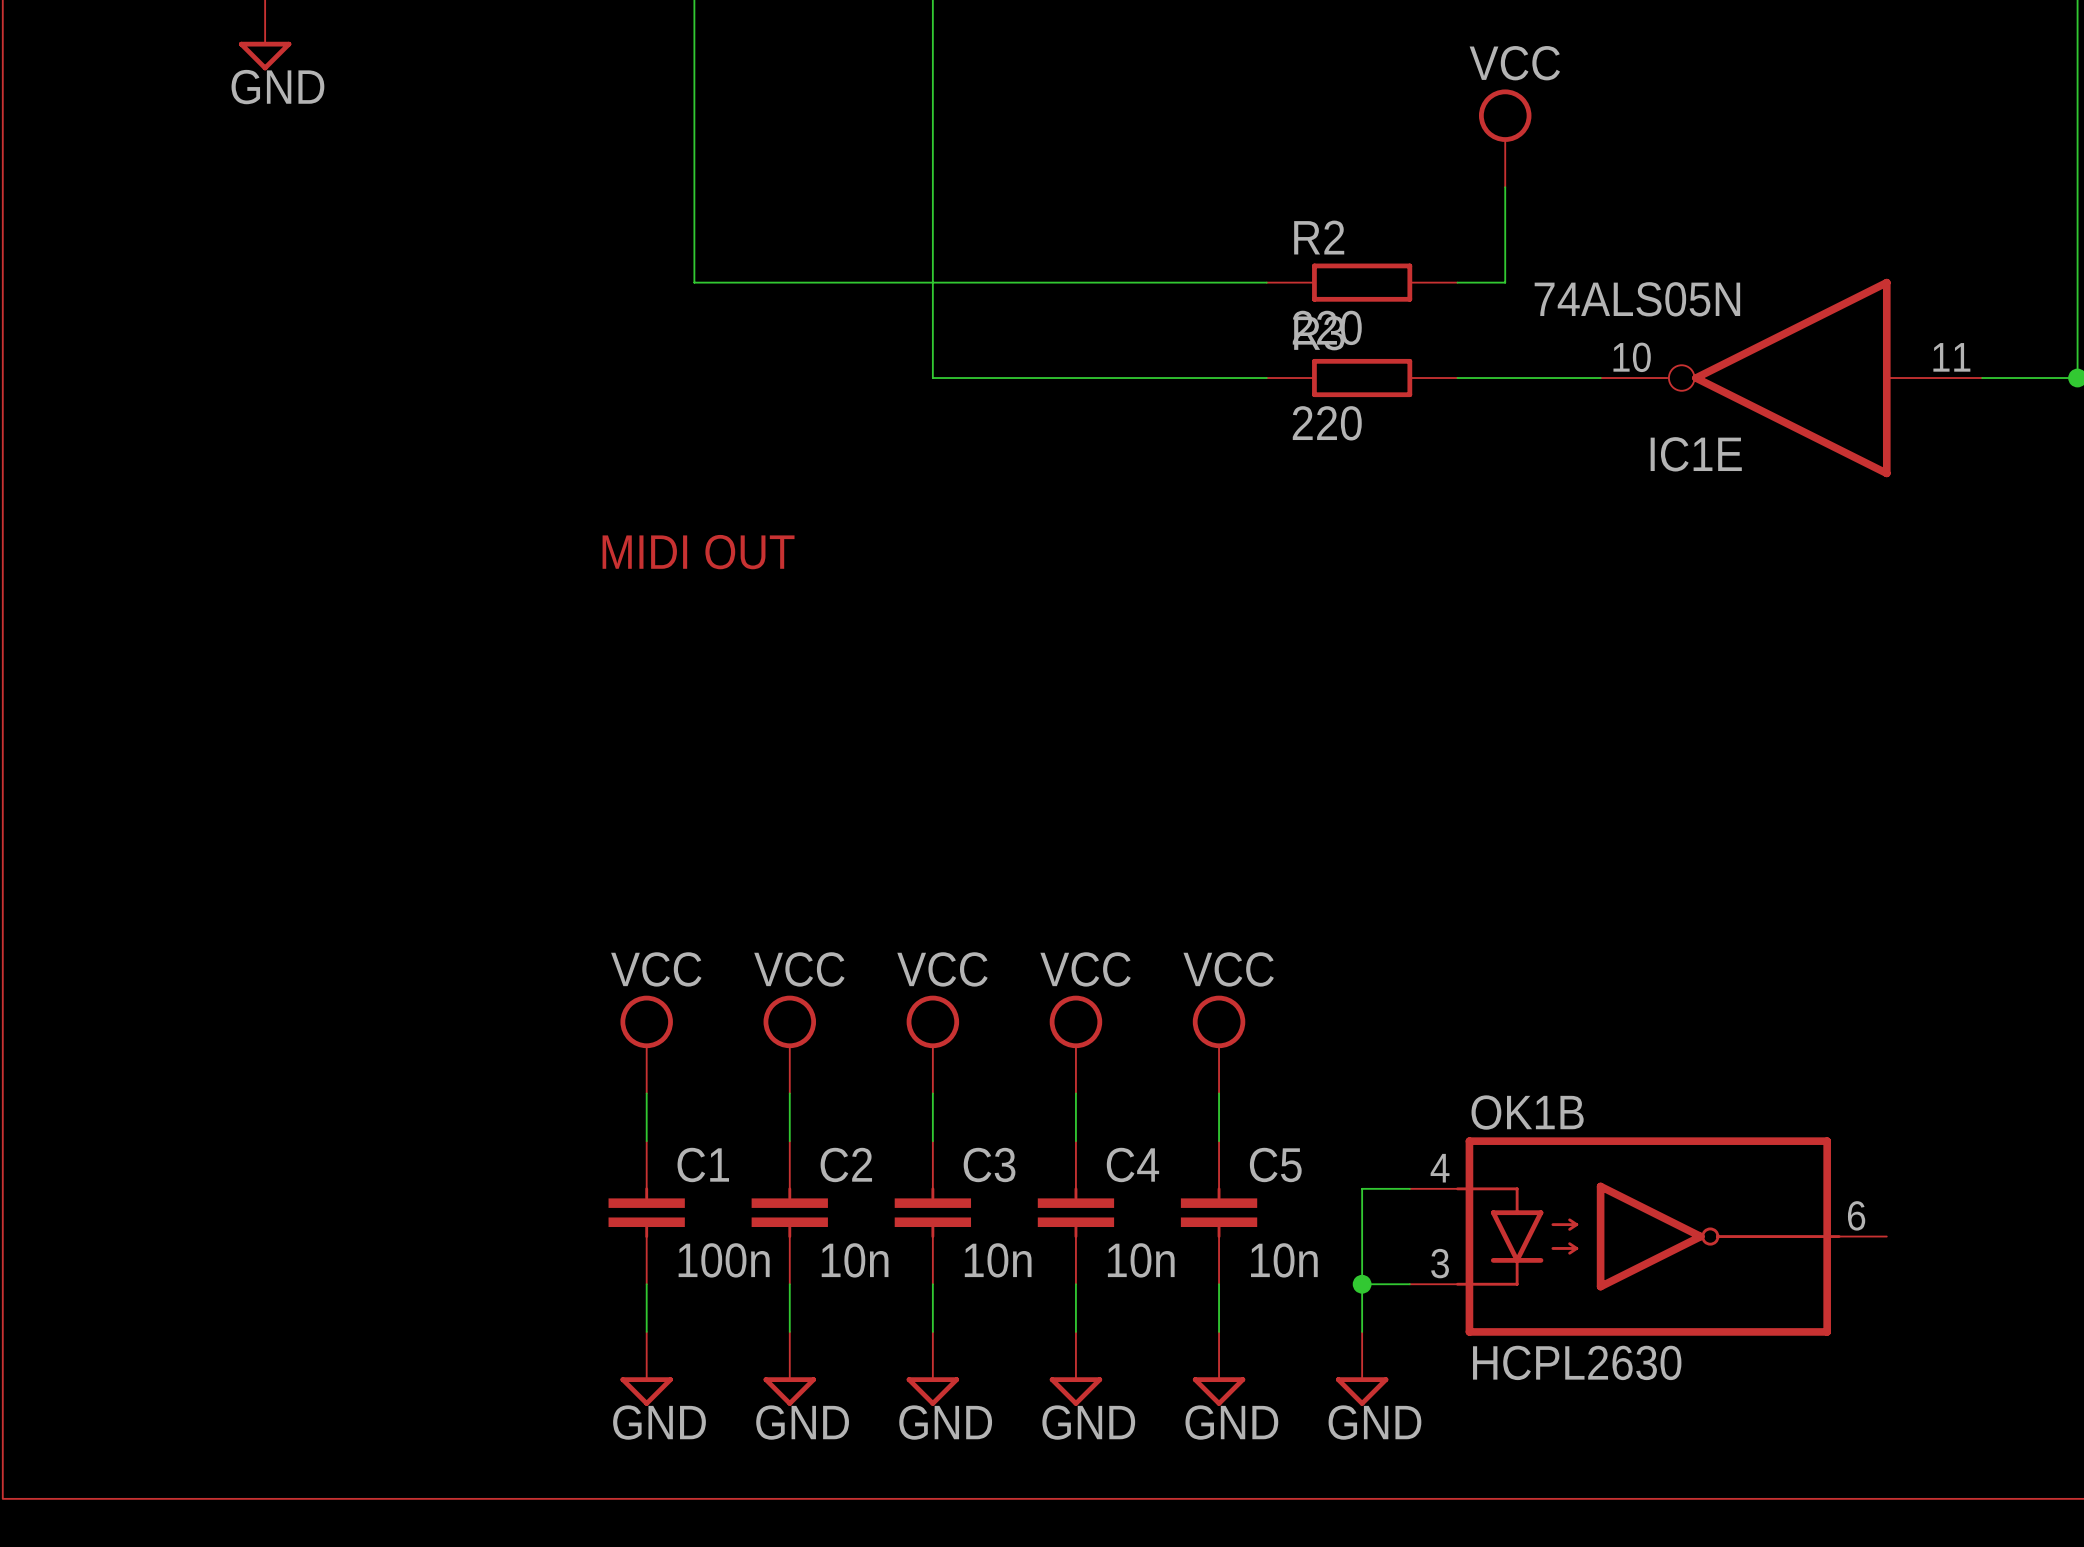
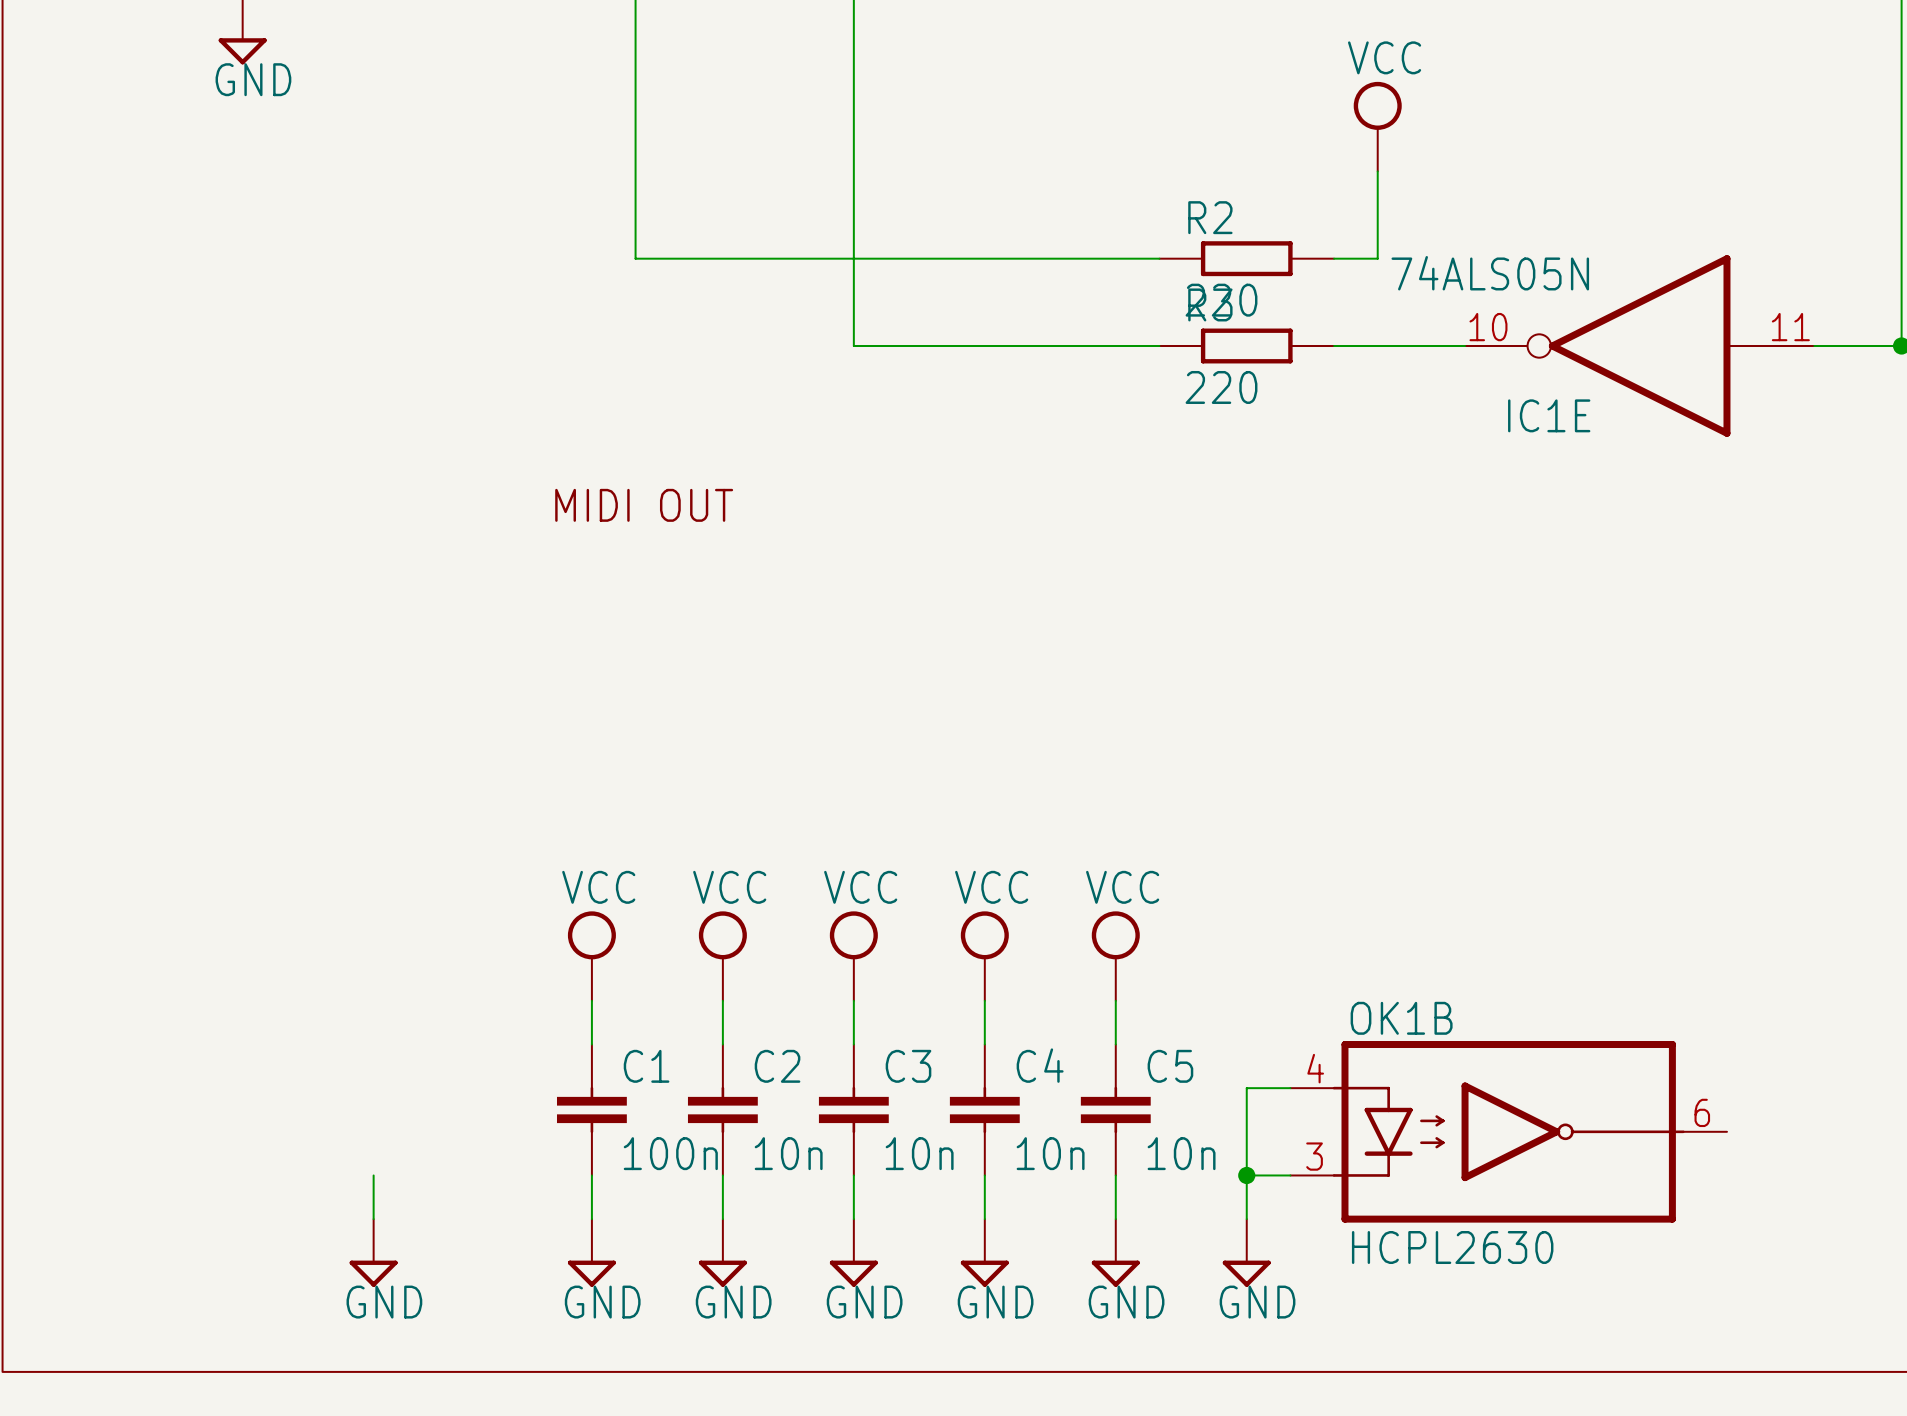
wire: none -> (373, 1175) (373, 1219)
power symbol: none -> GND (373, 1252)

